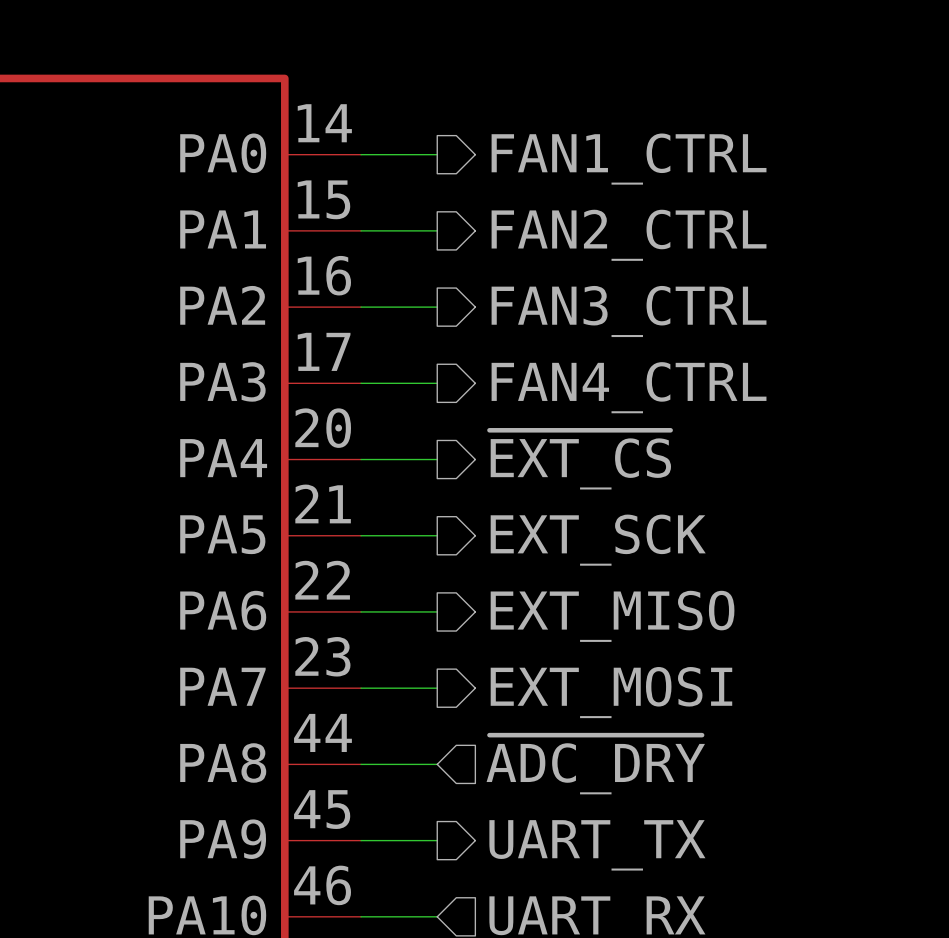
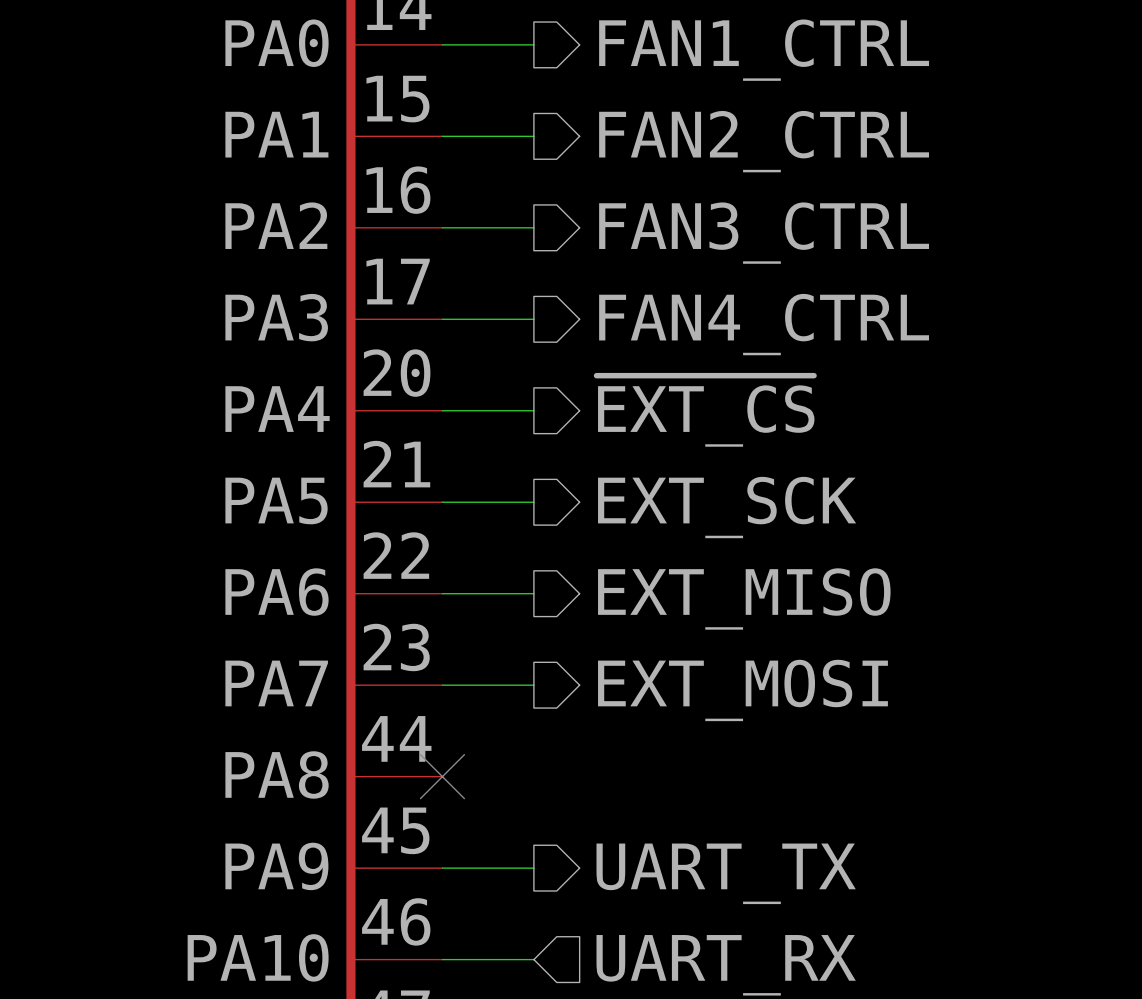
wire: (361, 764) (437, 764) -> none
no-connect mark: none -> (442, 776)
hierarchical label: ~{ADC_DRY} (595, 764) -> none

